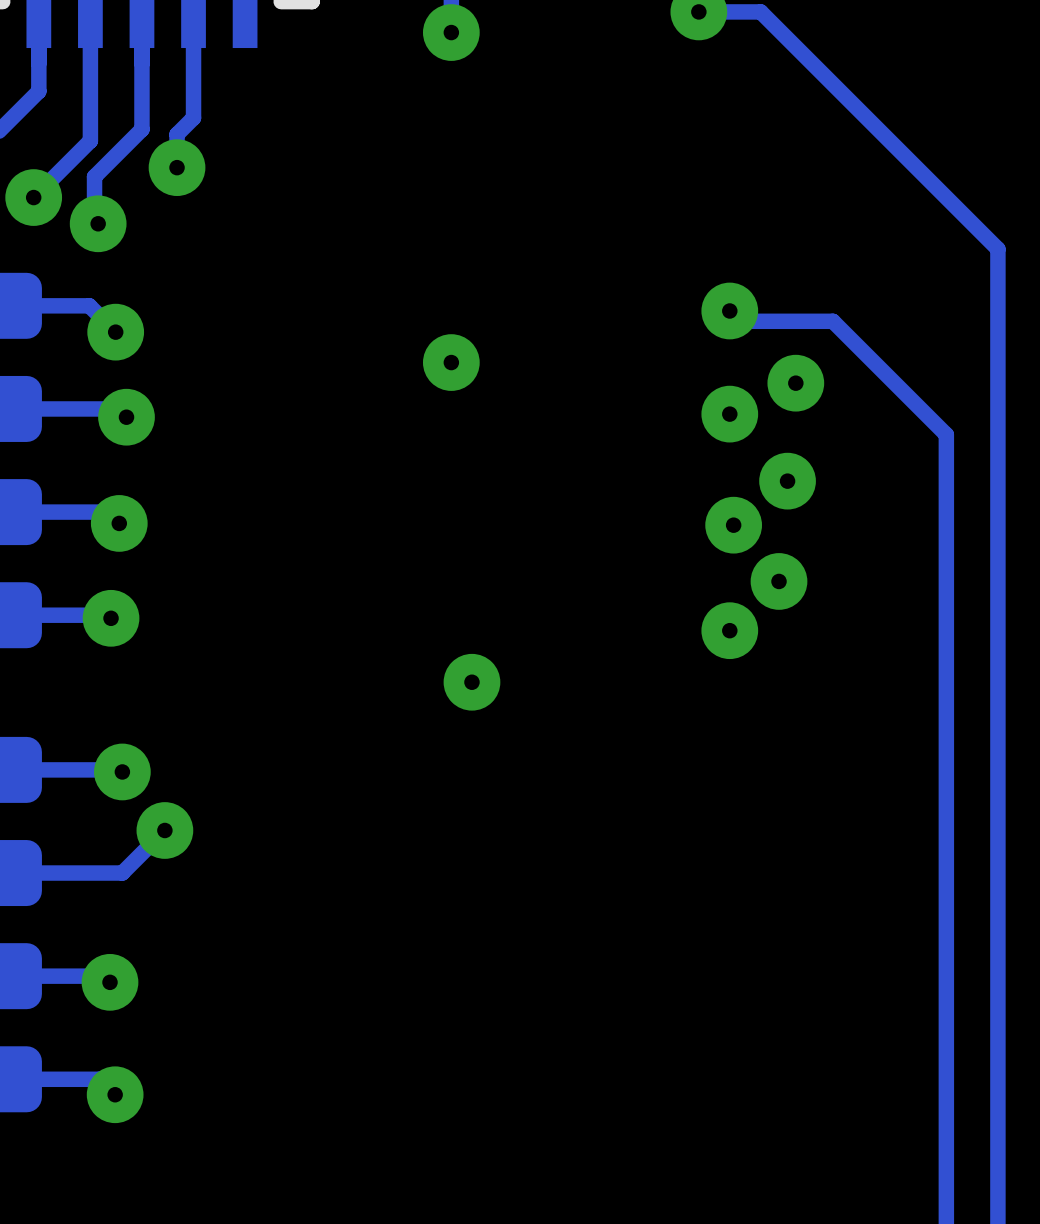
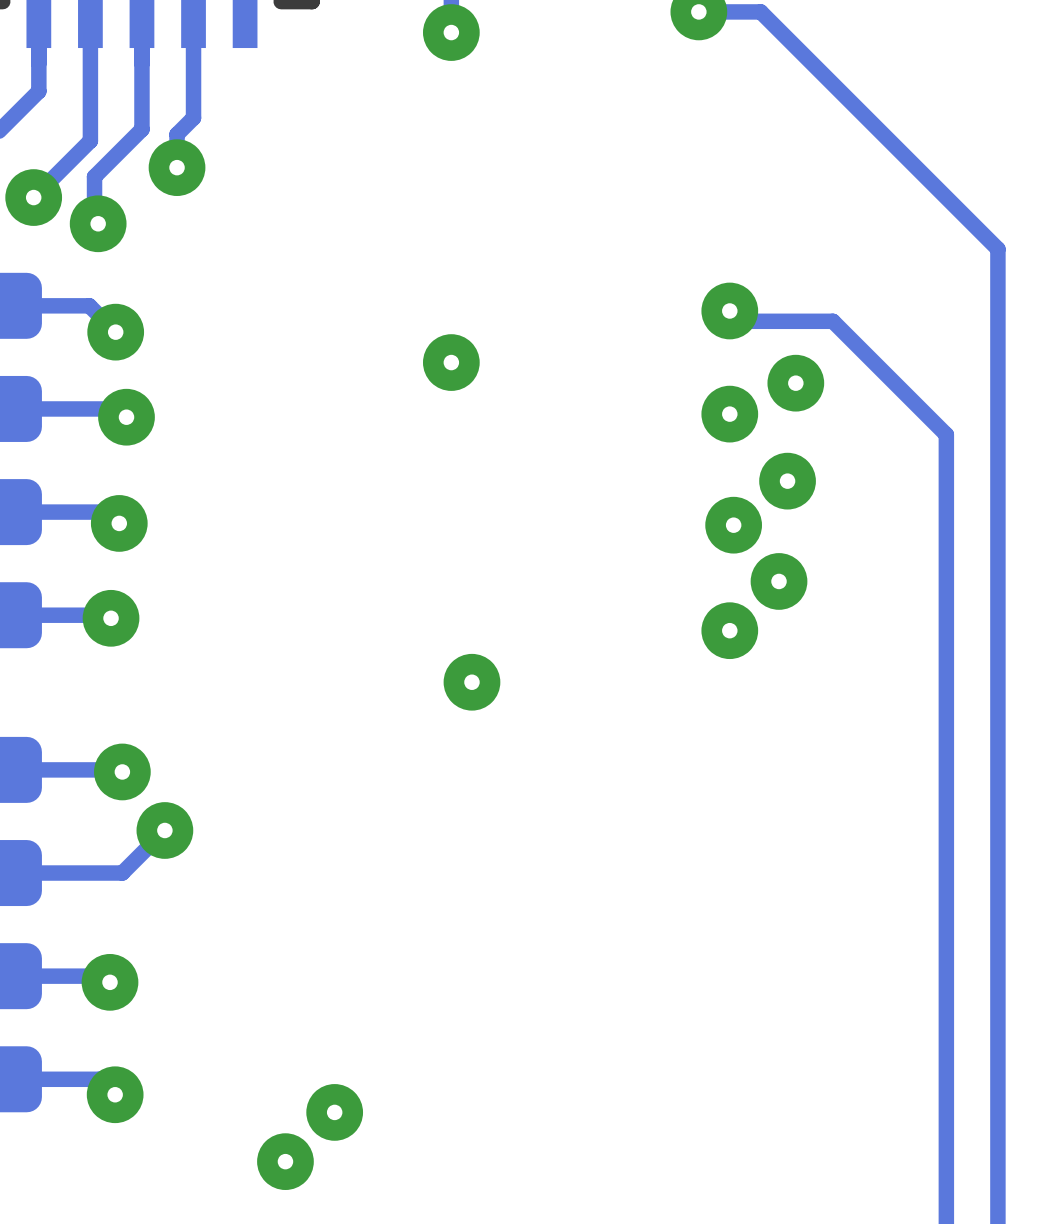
via: none -> (334, 1112)
via: none -> (285, 1161)

